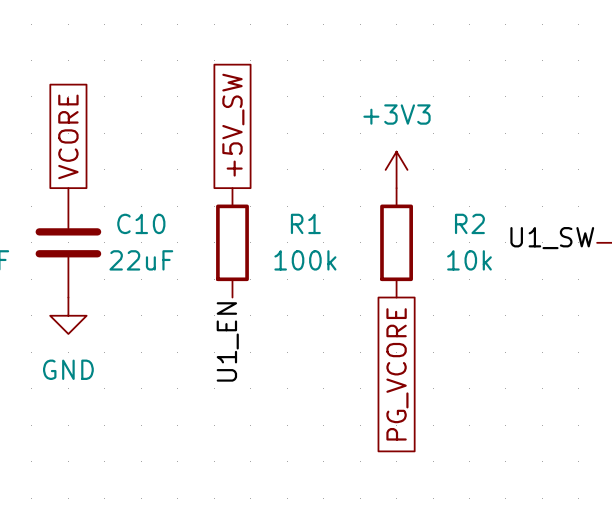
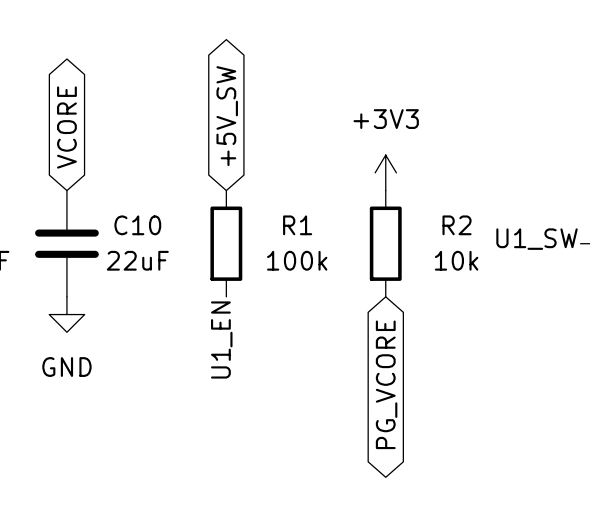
global label shape: passive (233, 125) -> bidirectional (227, 116)
global label shape: passive (68, 136) -> bidirectional (66, 127)
global label shape: passive (397, 374) -> bidirectional (386, 384)

